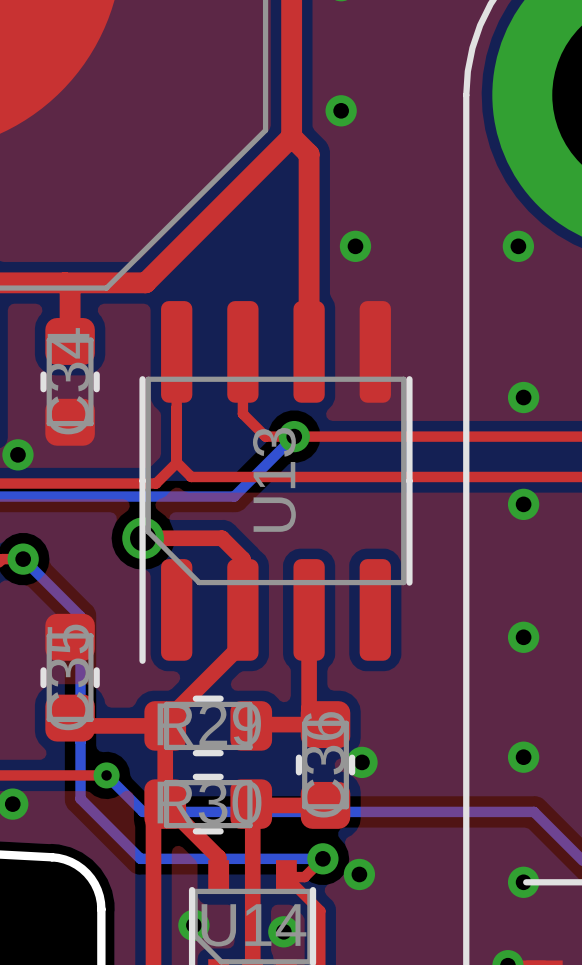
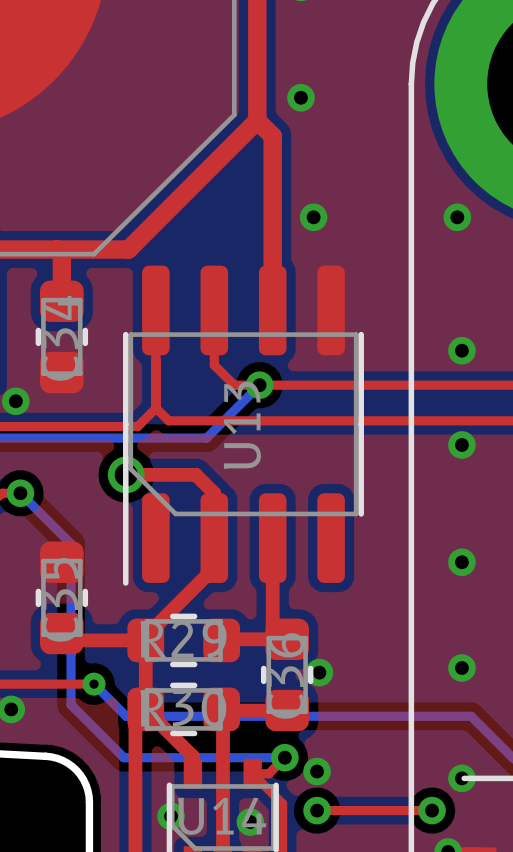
top track: none -> (317, 810) (432, 810)
via: none -> (317, 810)
via: none -> (432, 810)

